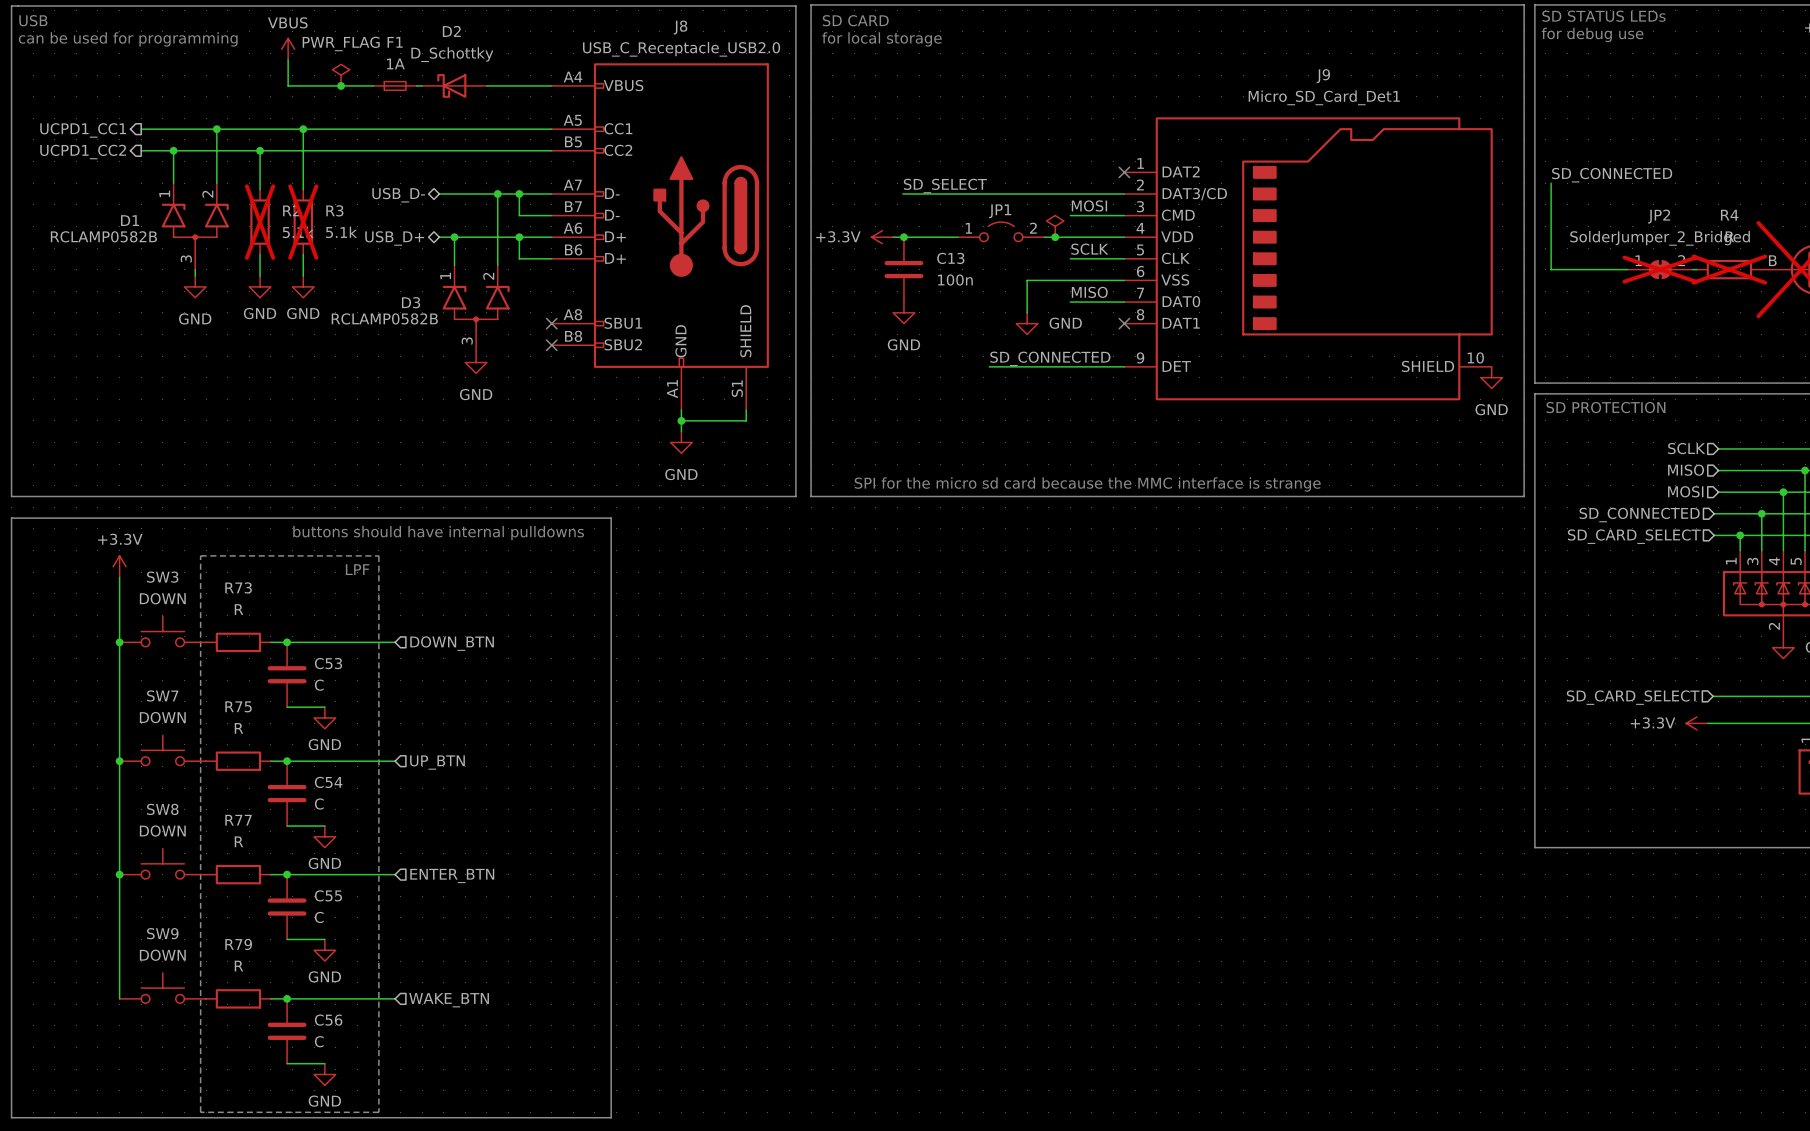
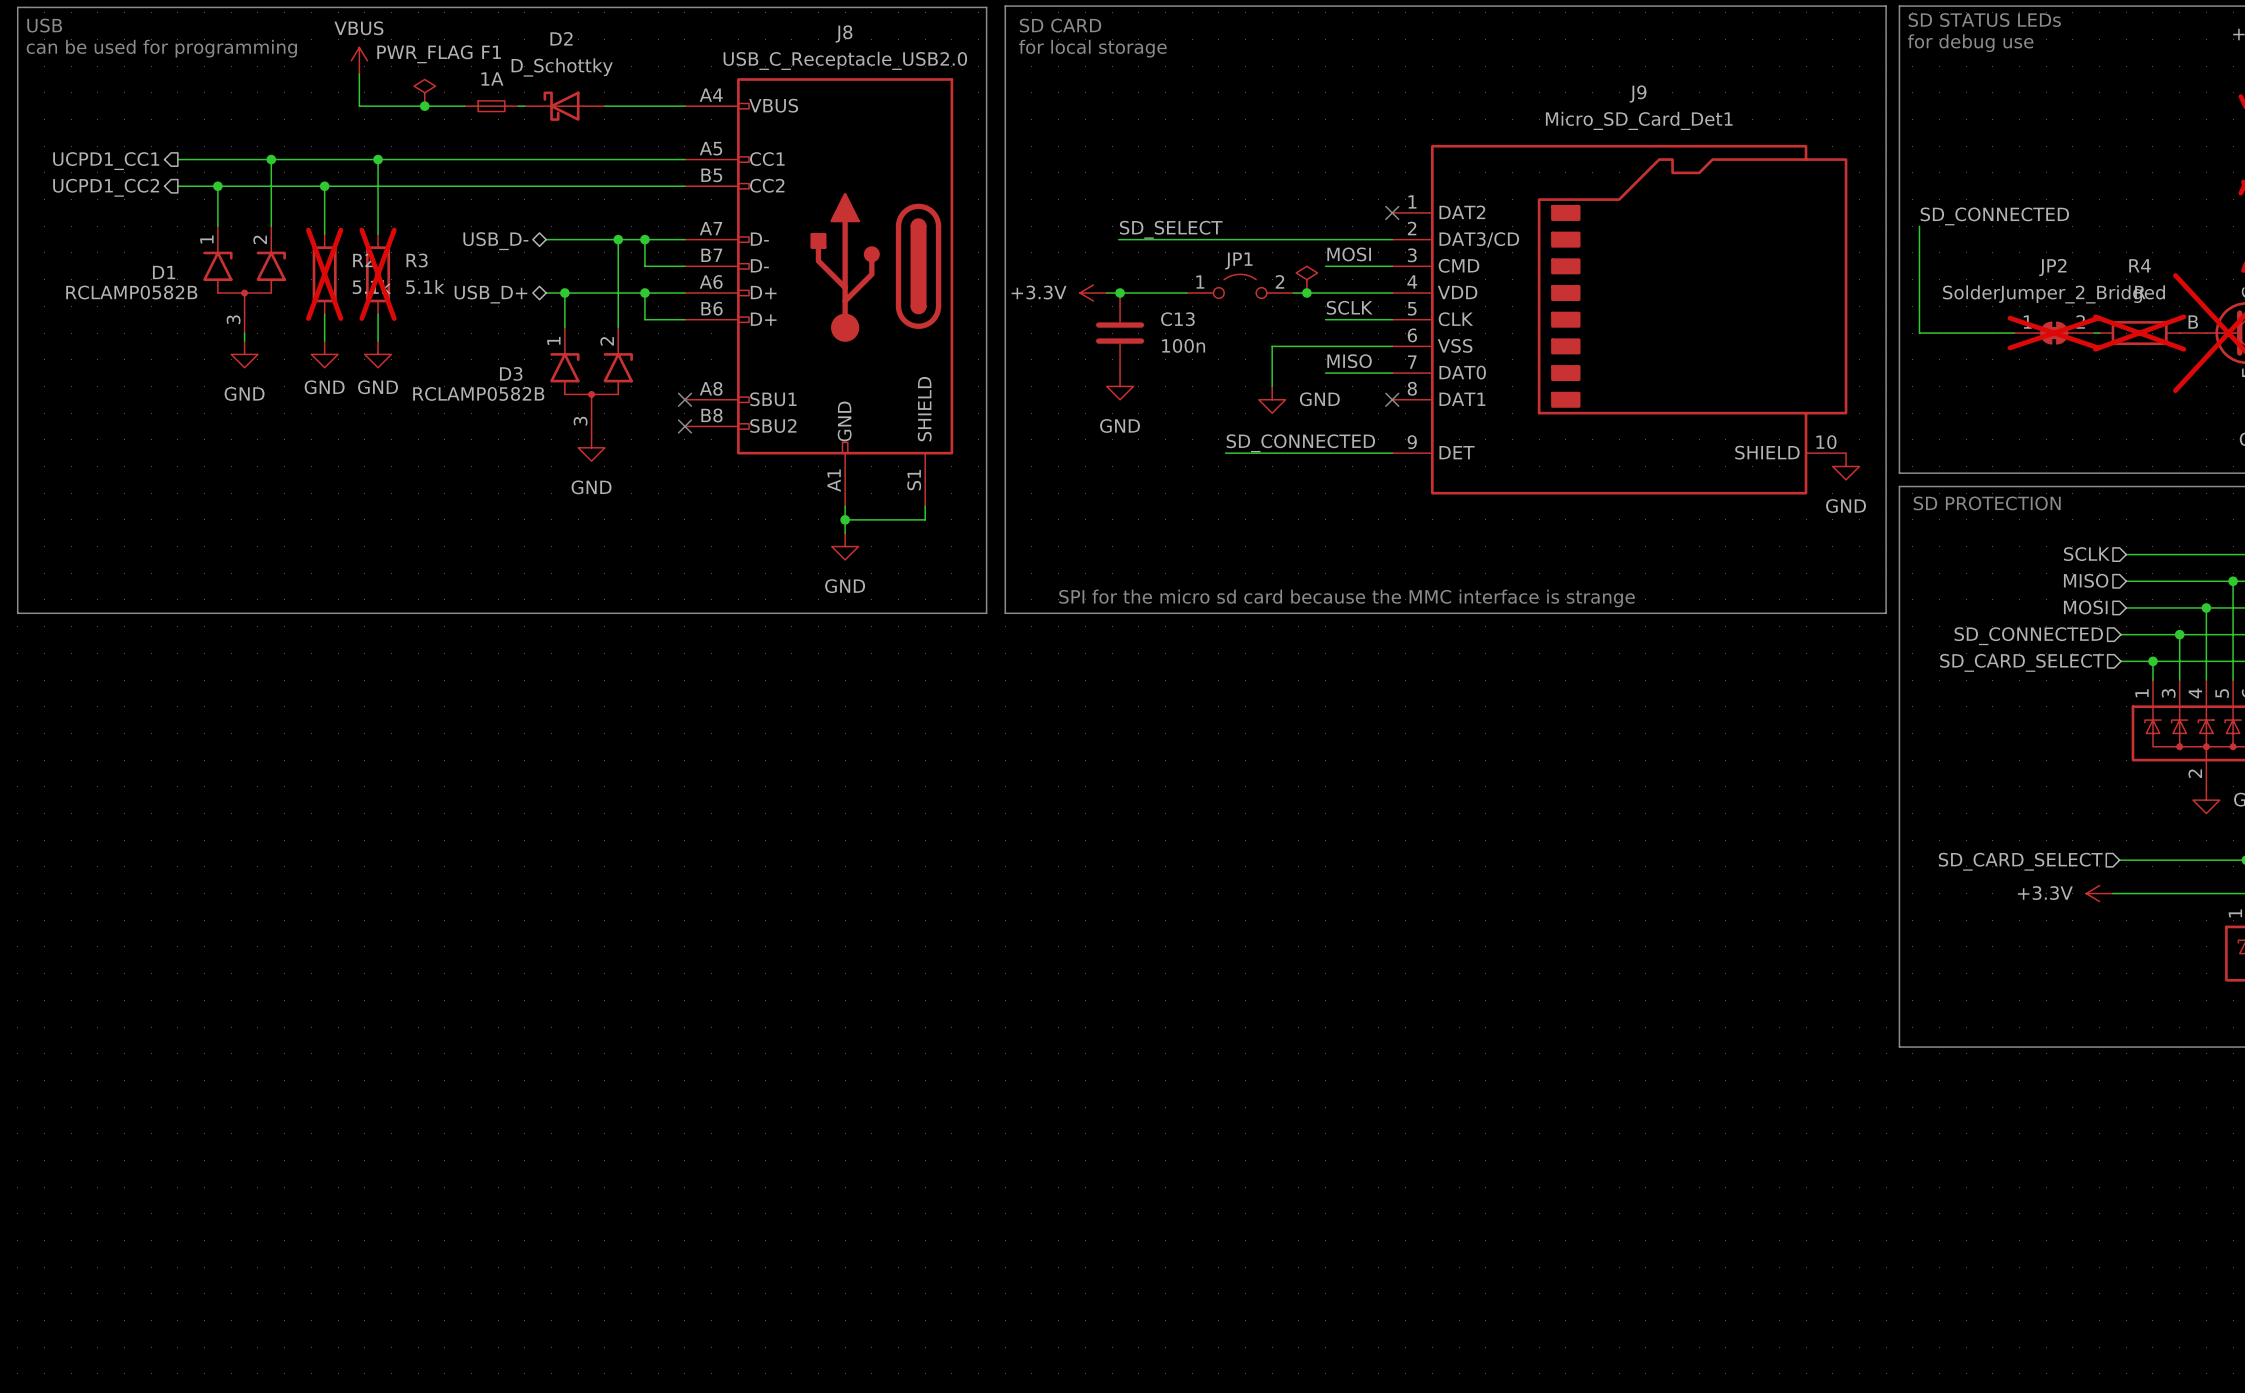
line: (11, 518) (611, 518) (611, 1117) (11, 1117) (11, 518) -> none
text: buttons should have internal pulldowns (438, 533) -> none
line: (200, 555) (378, 555) (378, 1112) (200, 1112) (200, 555) -> none
power symbol: +3.3V (119, 566) -> none
text: LPF (357, 569) -> none
wire: (119, 577) (119, 998) -> none
SW3: DOWN (162, 631) -> none
junction: (119, 642) -> none
R73: R (238, 642) -> none
wire: (270, 642) (395, 642) -> none
junction: (287, 642) -> none
hierarchical label: DOWN_BTN (452, 643) -> none
C53: C (287, 674) -> none
wire: (287, 707) (324, 707) -> none
power symbol: GND (324, 717) -> none
SW7: DOWN (162, 750) -> none
junction: (119, 761) -> none
R75: R (238, 761) -> none
wire: (270, 761) (395, 761) -> none
junction: (287, 761) -> none
hierarchical label: UP_BTN (437, 762) -> none
C54: C (287, 793) -> none
wire: (287, 826) (324, 826) -> none
power symbol: GND (324, 836) -> none
SW8: DOWN (162, 863) -> none
junction: (119, 874) -> none
R77: R (238, 874) -> none
wire: (270, 874) (395, 874) -> none
junction: (287, 874) -> none
hierarchical label: ENTER_BTN (452, 875) -> none
C55: C (287, 907) -> none
wire: (287, 939) (324, 939) -> none
power symbol: GND (324, 950) -> none
SW9: DOWN (162, 988) -> none
R79: R (238, 998) -> none
wire: (270, 998) (395, 998) -> none
junction: (287, 998) -> none
hierarchical label: WAKE_BTN (449, 1000) -> none
C56: C (287, 1031) -> none
wire: (287, 1063) (324, 1063) -> none
power symbol: GND (324, 1074) -> none

